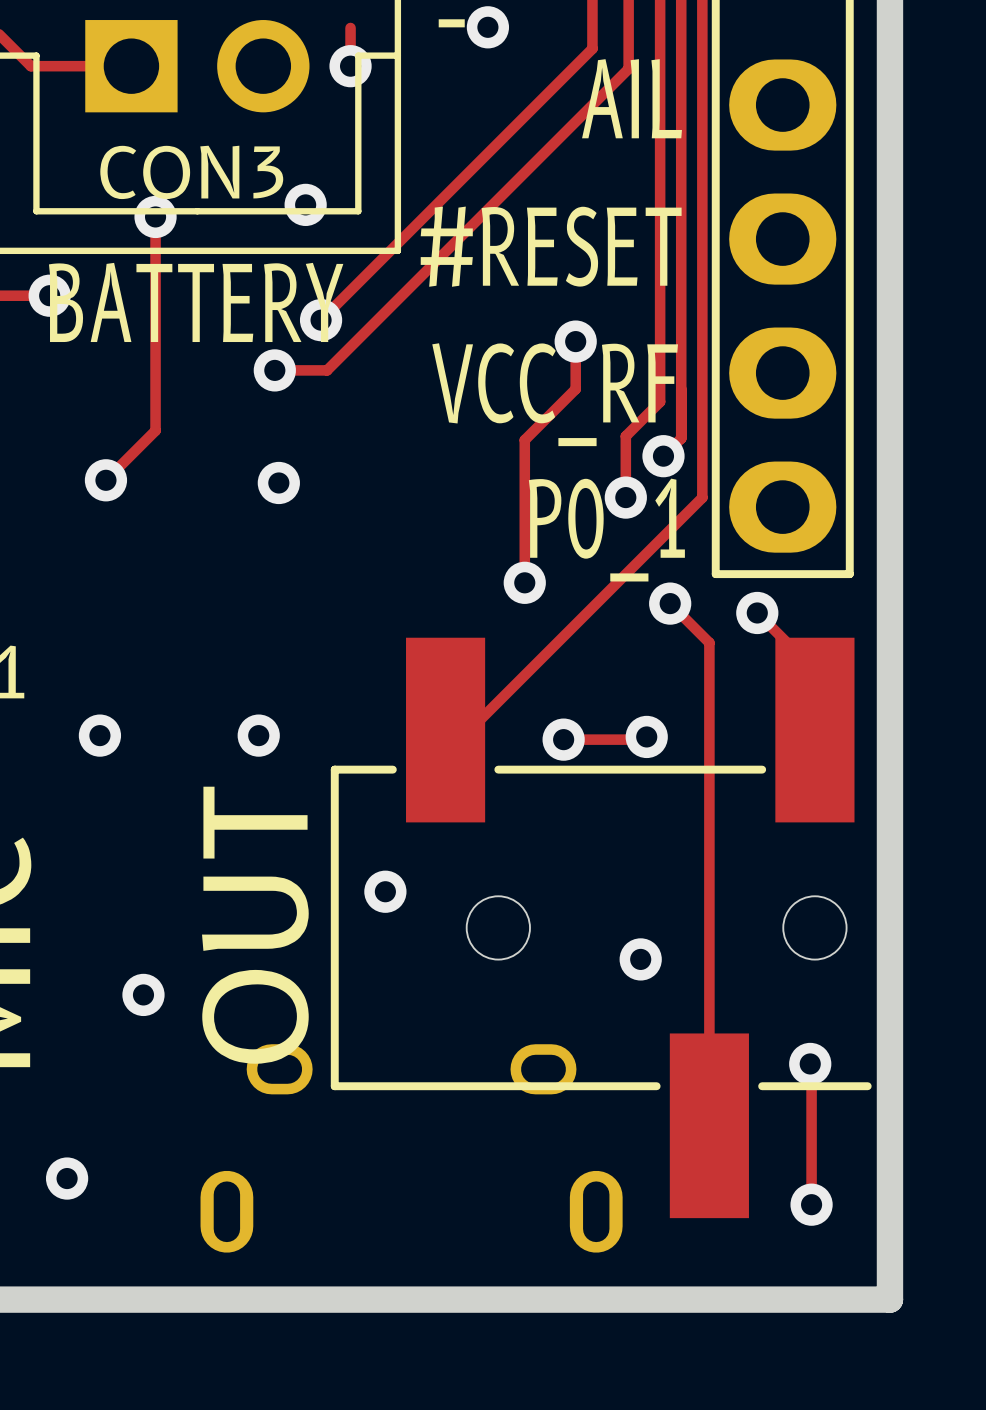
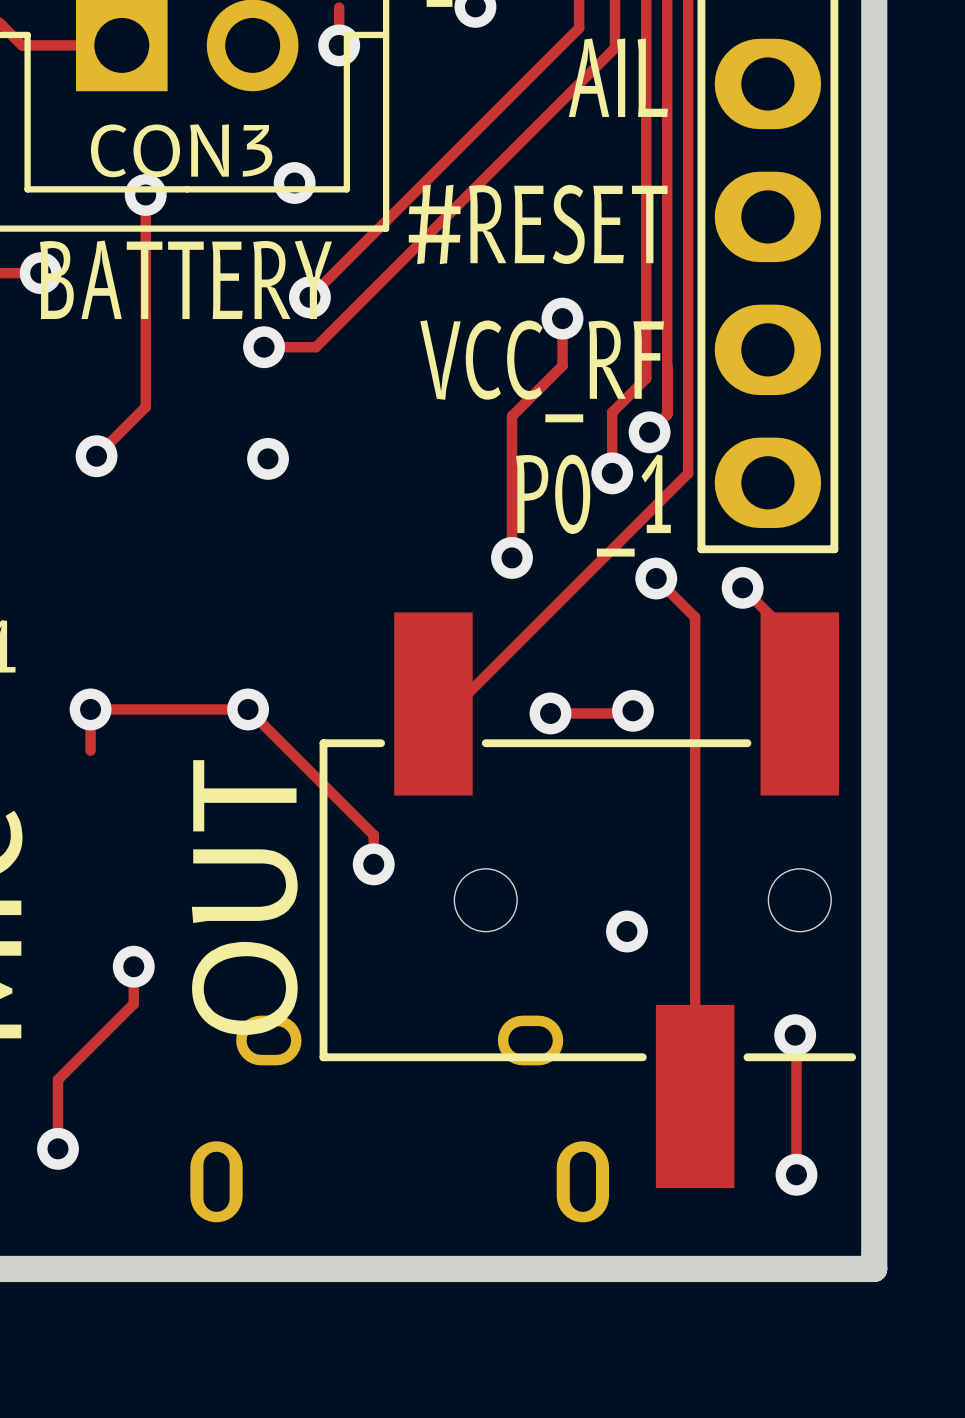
track: none -> (90, 750) (90, 709) (248, 709) (373, 835) (373, 864)
track: none -> (133, 966) (133, 1003) (57, 1079) (57, 1148)

